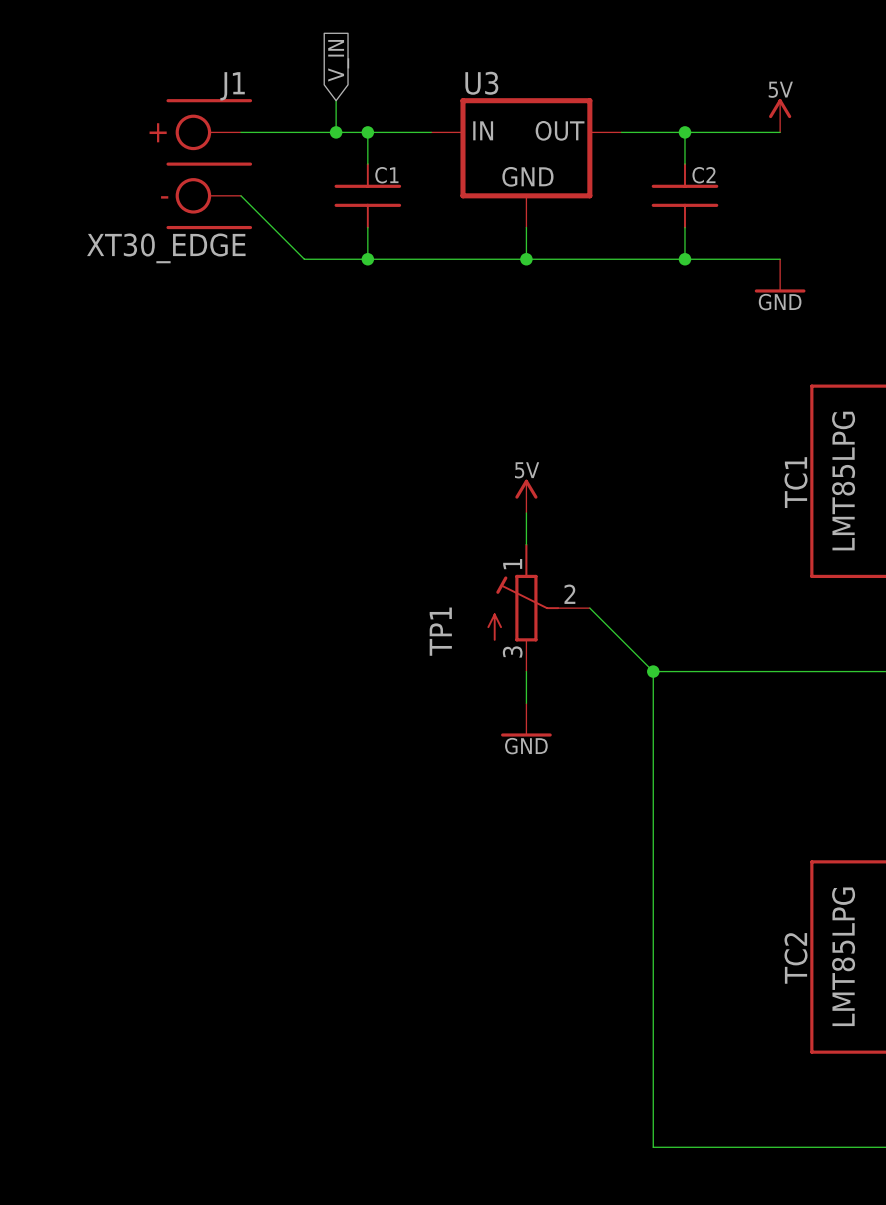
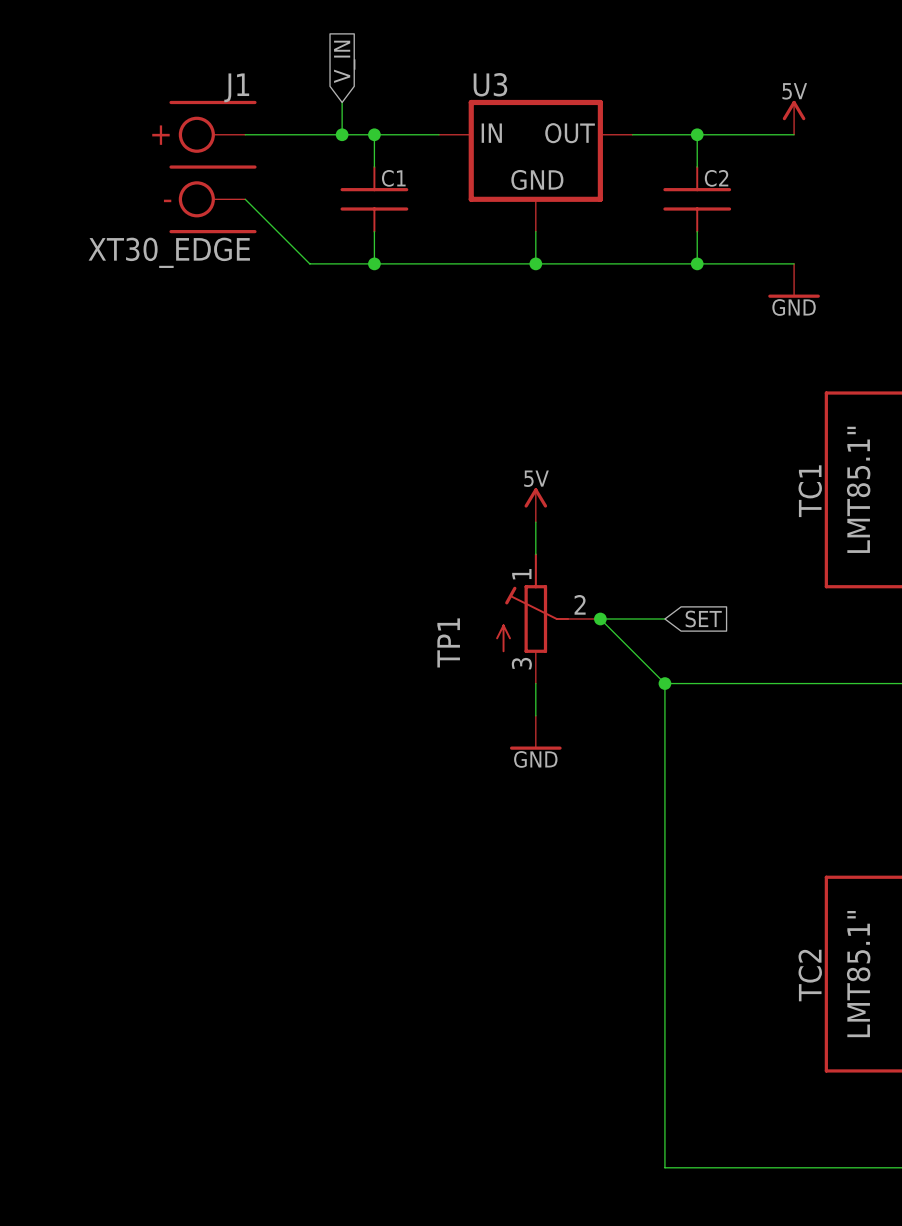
TC1 value: LMT85LPG (843, 481) -> LMT85.1" (858, 489)
wire: none -> (600, 619) (664, 619)
junction: none -> (600, 619)
global label: none -> SET (703, 619)
TC2 value: LMT85LPG (843, 956) -> LMT85.1" (858, 974)

